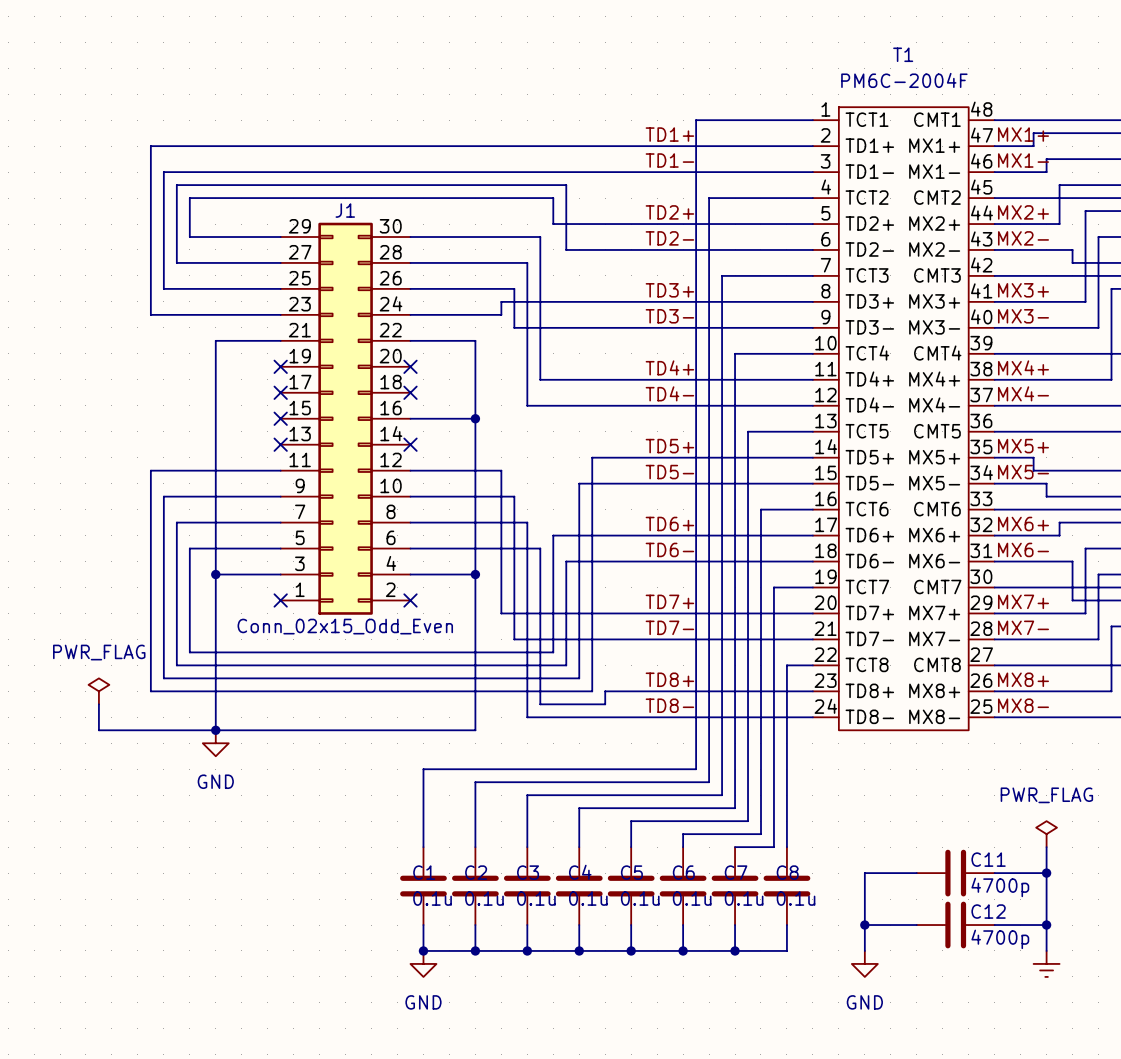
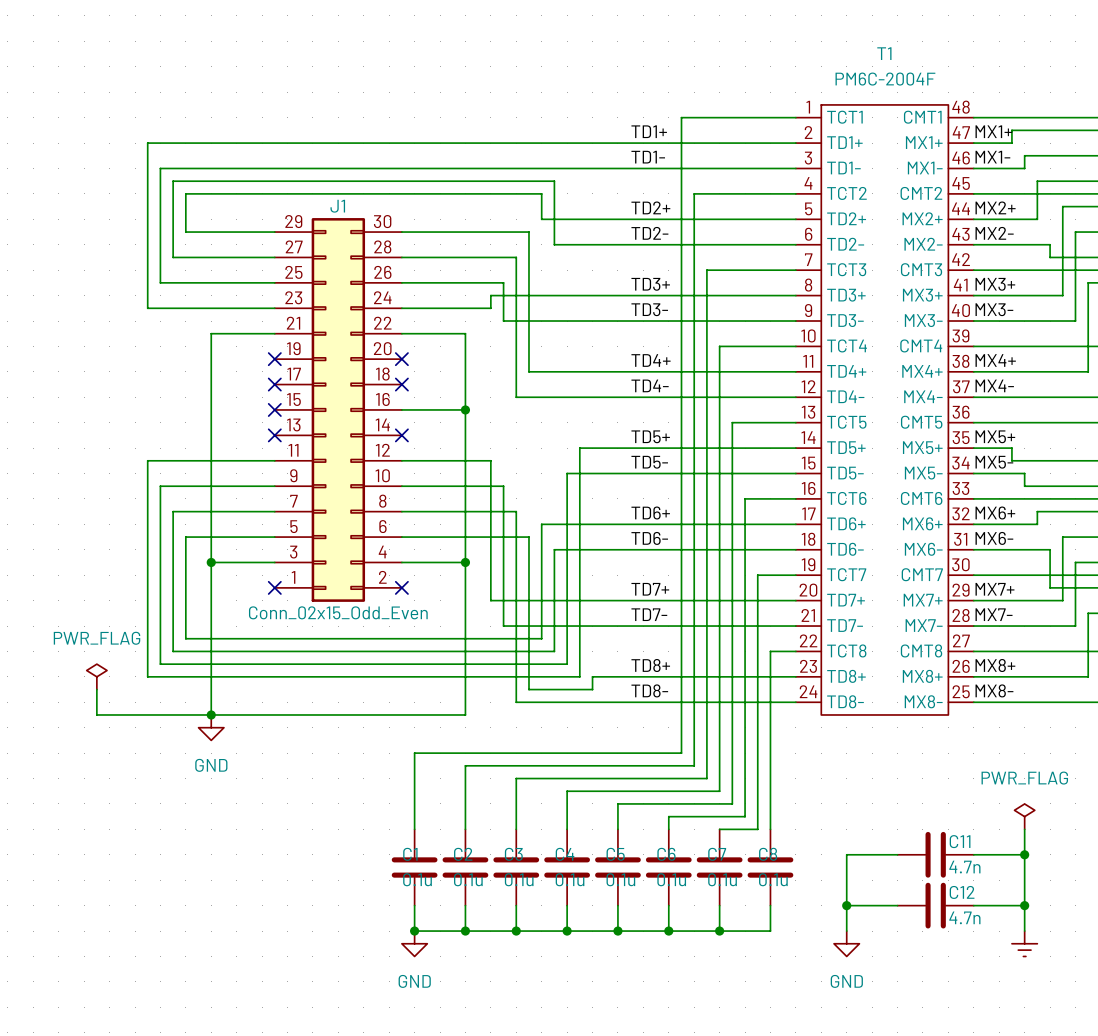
C11 value: 4700p (1000, 887) -> 4.7n (964, 867)
C12 value: 4700p (1000, 939) -> 4.7n (964, 917)

